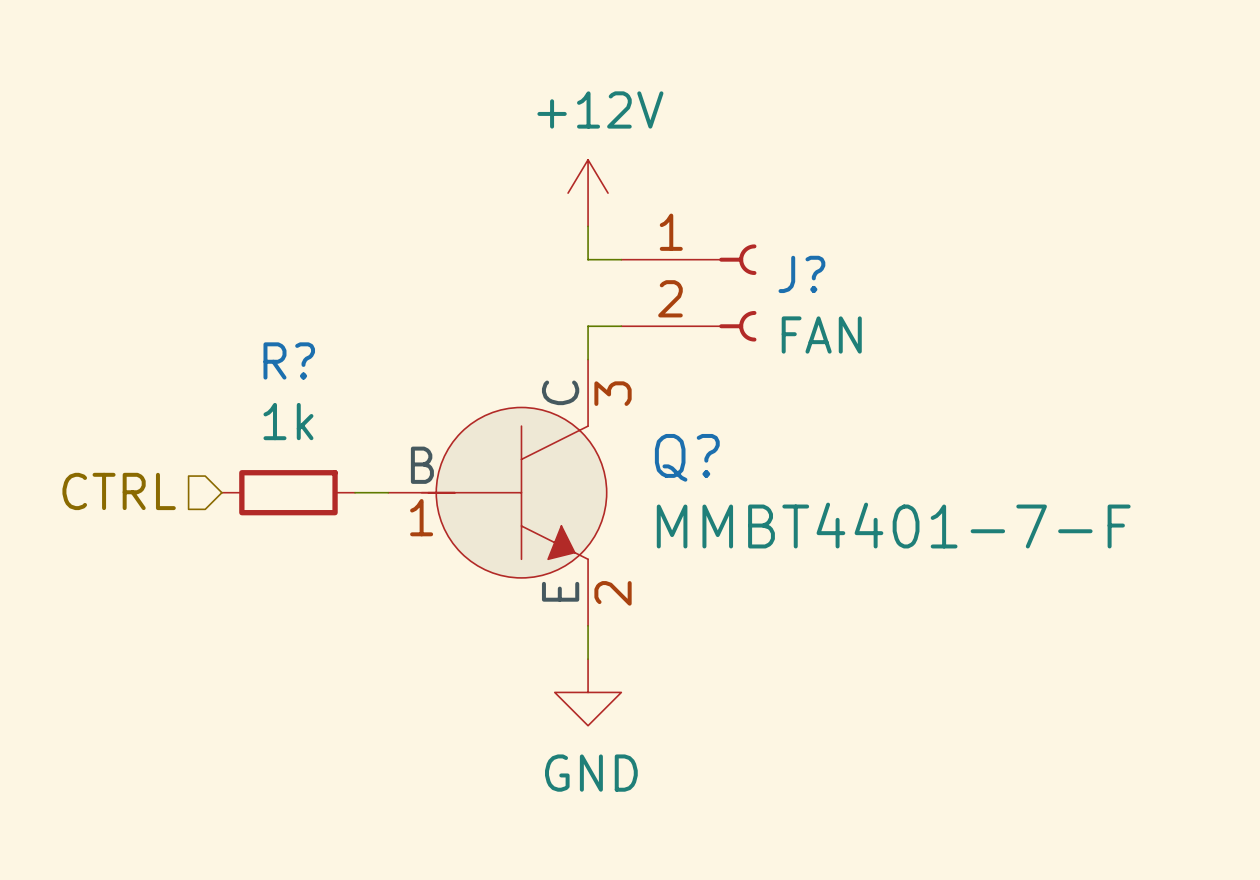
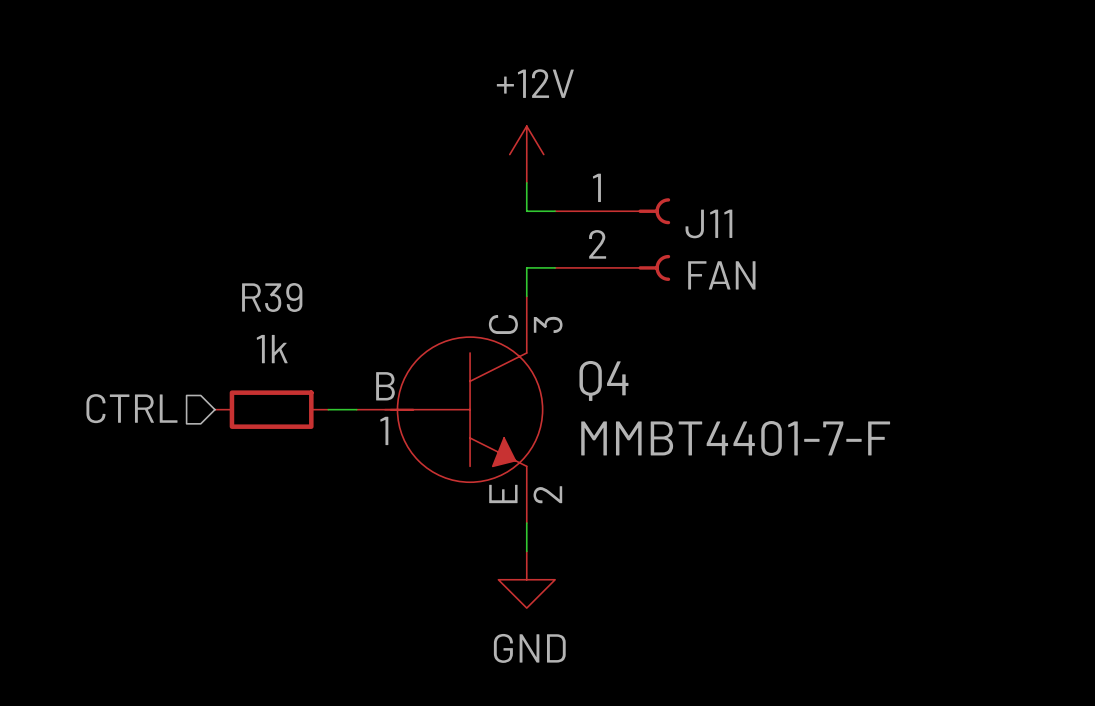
J? name: J? (801, 274) -> J11 (708, 223)
R? name: R? (289, 360) -> R39 (272, 297)
Q? name: Q? (687, 457) -> Q4 (603, 380)

